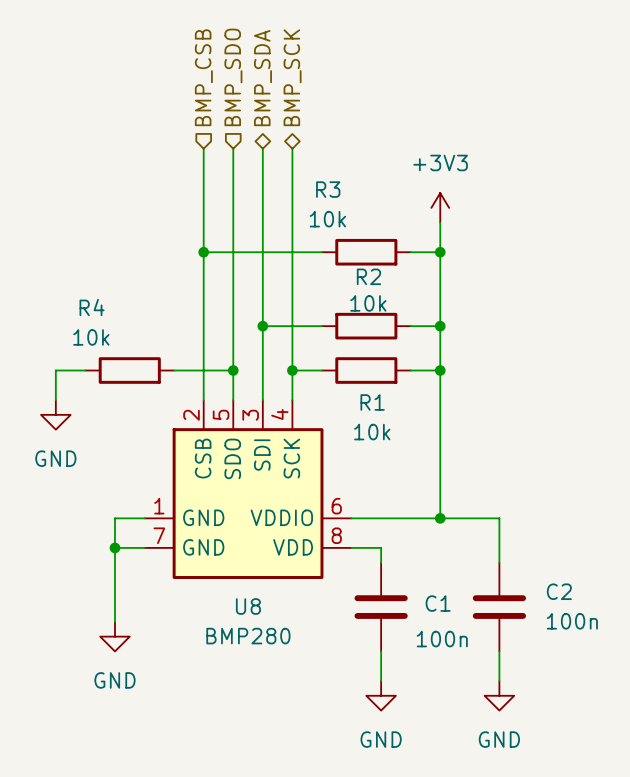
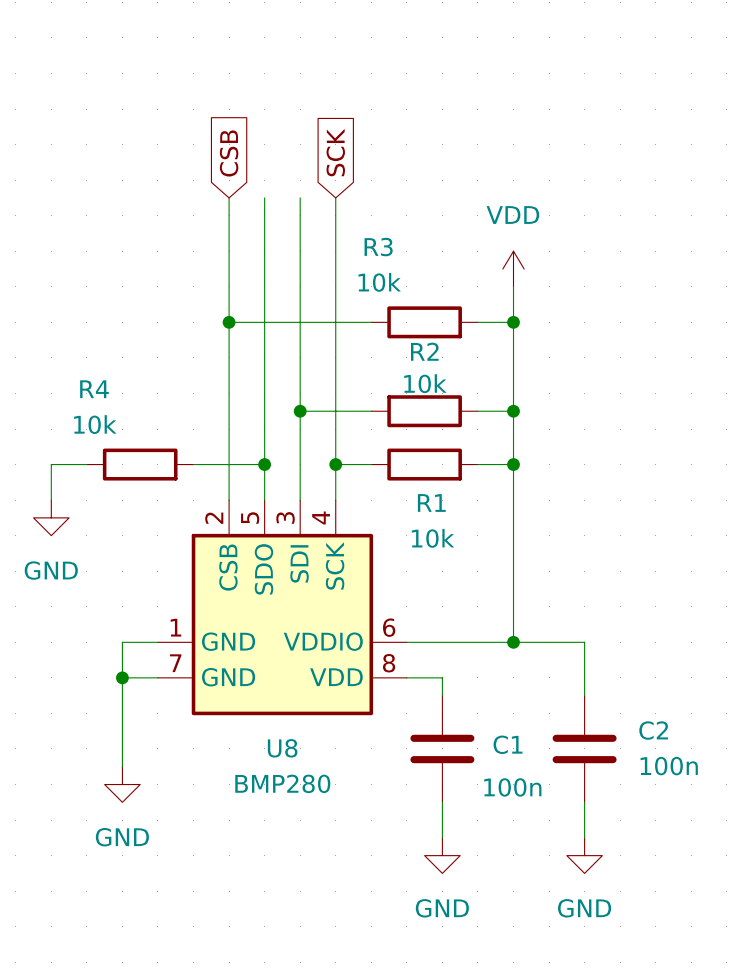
hierarchical label: BMP_CSB (203, 77) -> none
hierarchical label: BMP_SDO (233, 77) -> none
hierarchical label: BMP_SCK (292, 77) -> none
hierarchical label: BMP_SDA (262, 78) -> none
global label: none -> CSB (229, 153)
global label: none -> SCK (335, 152)
power symbol: +3V3 (440, 207) -> VDD (513, 269)

